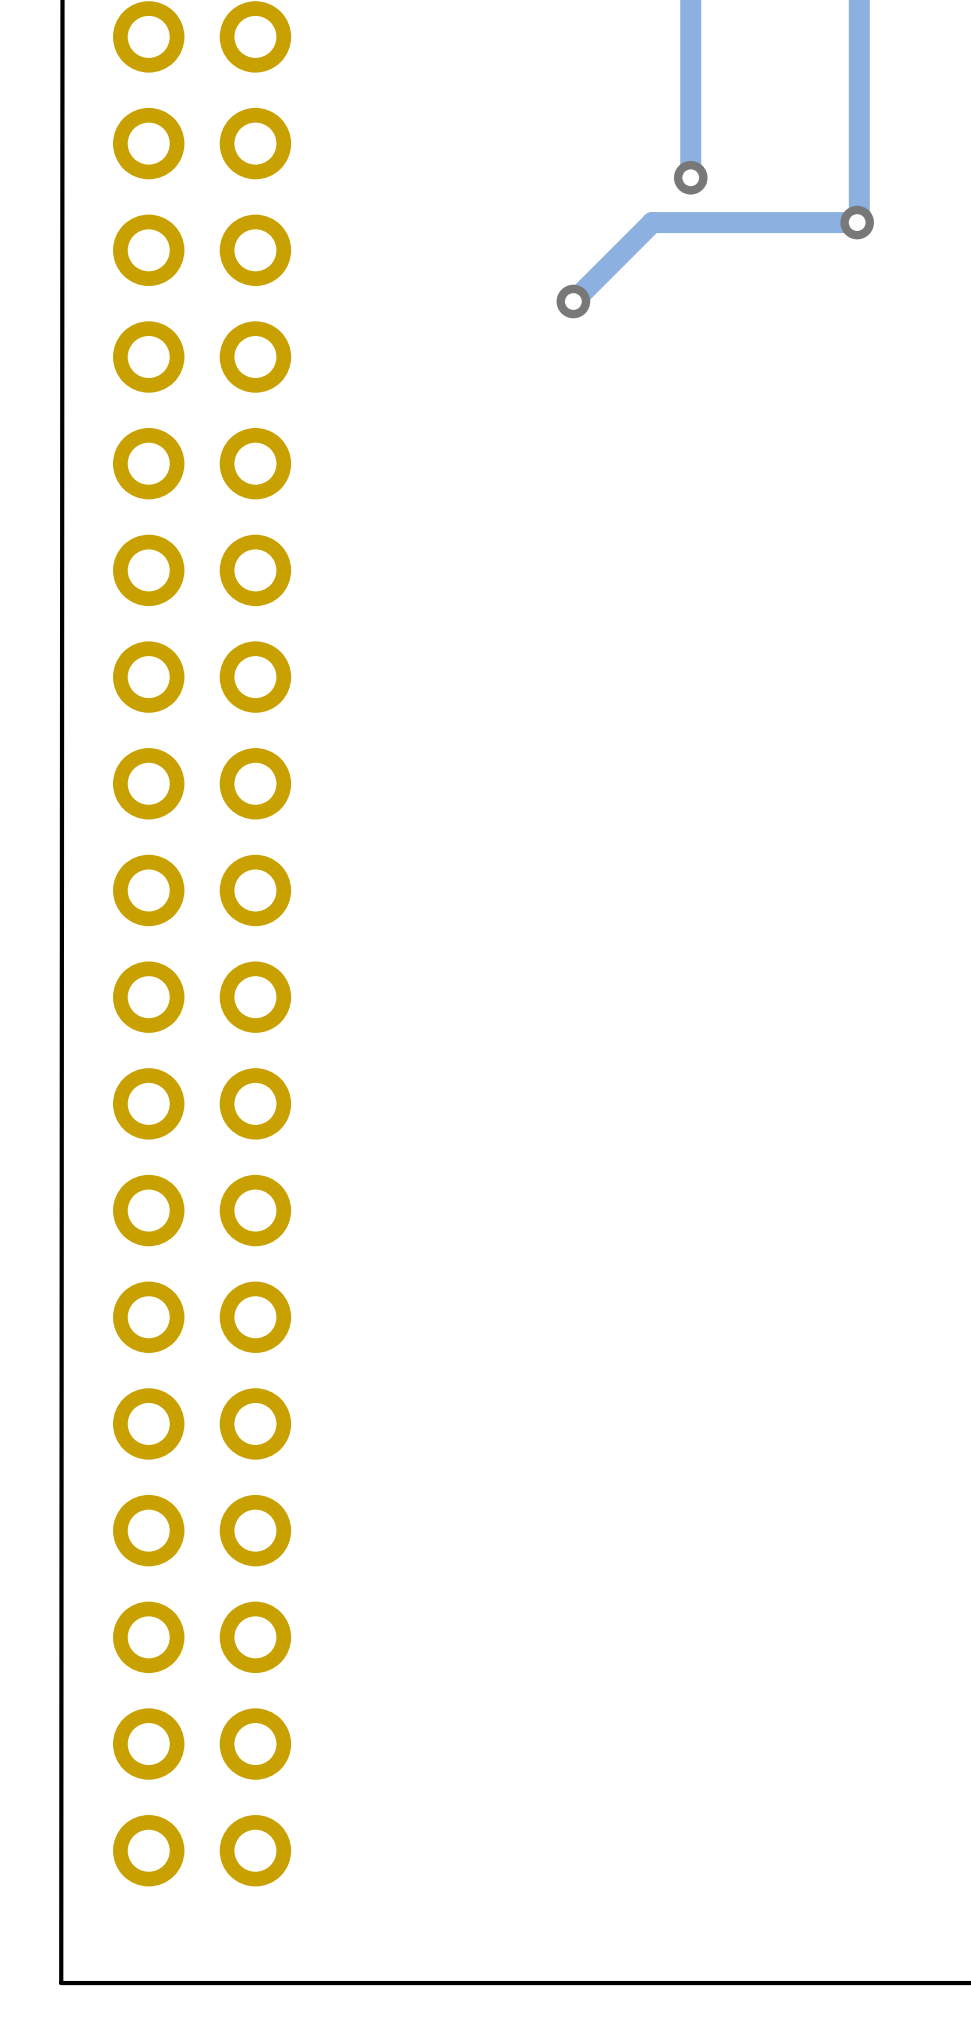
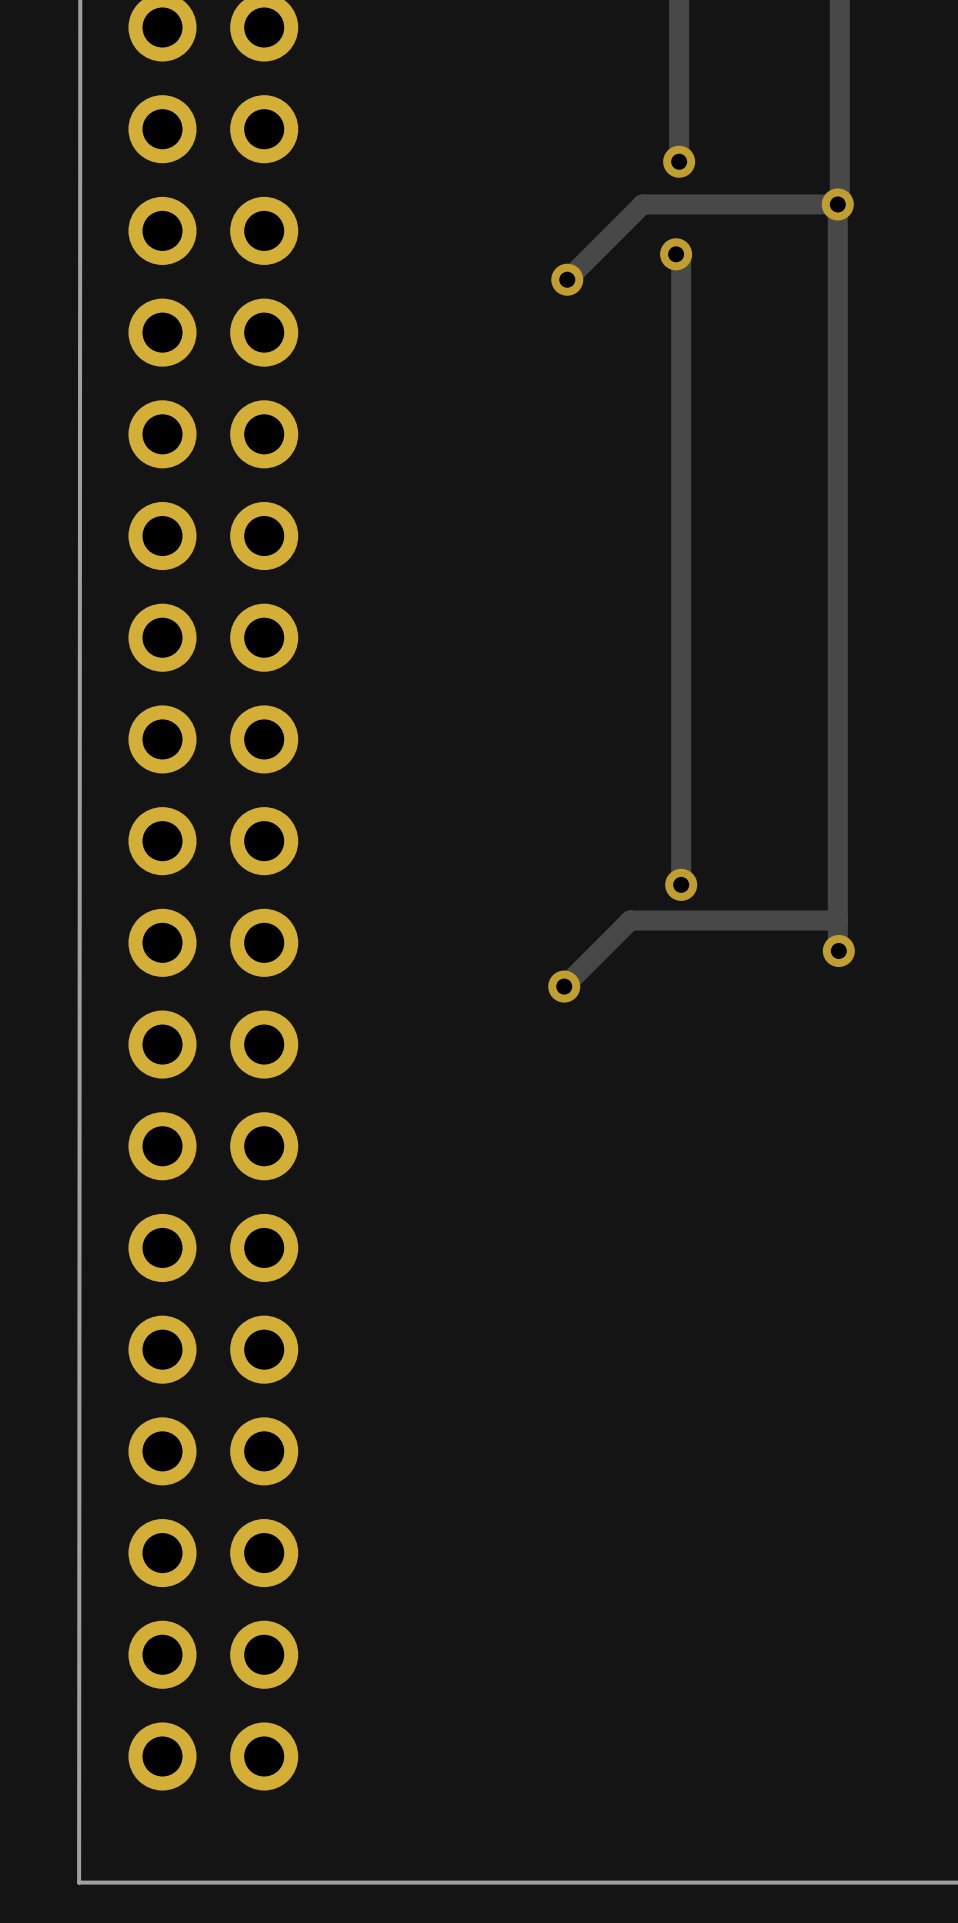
track: none -> (837, 204) (838, 950)
track: none -> (676, 254) (681, 259) (681, 884)
via: none -> (676, 254)
via: none -> (681, 884)
track: none -> (837, 920) (630, 920) (564, 986)
via: none -> (838, 950)
via: none -> (564, 986)

